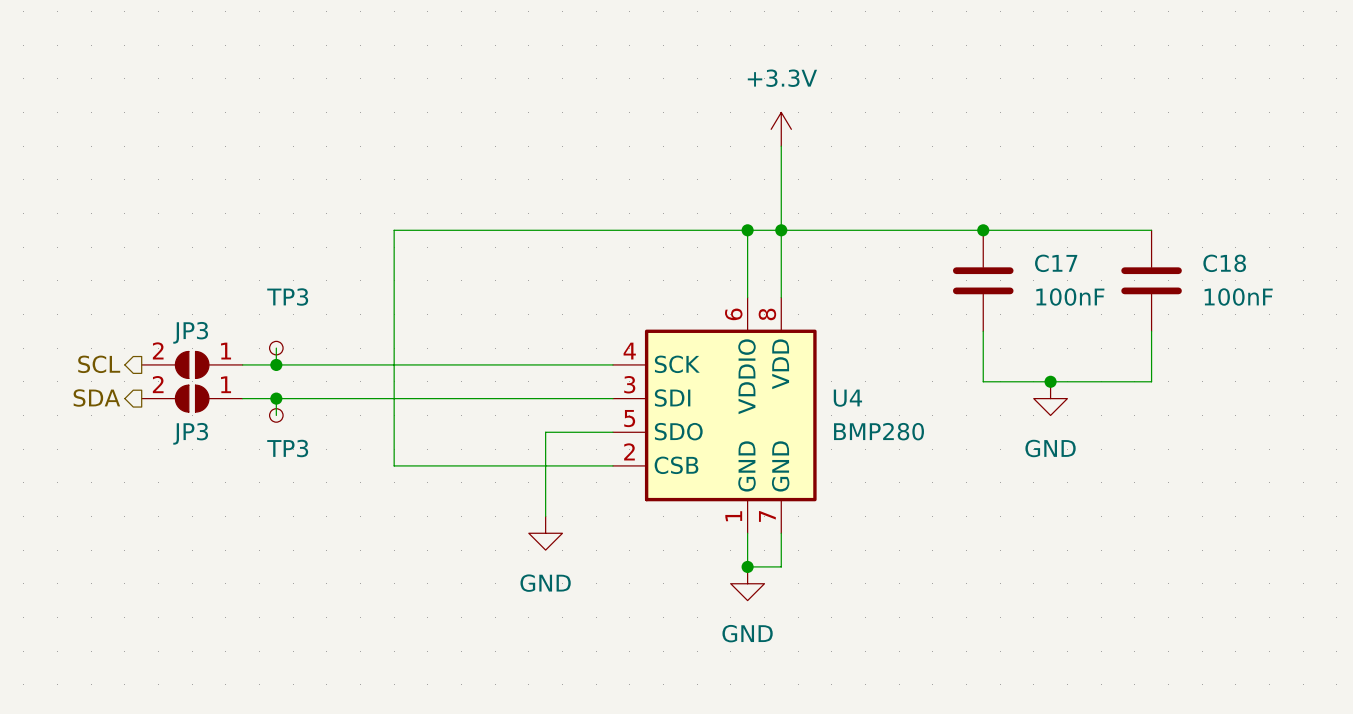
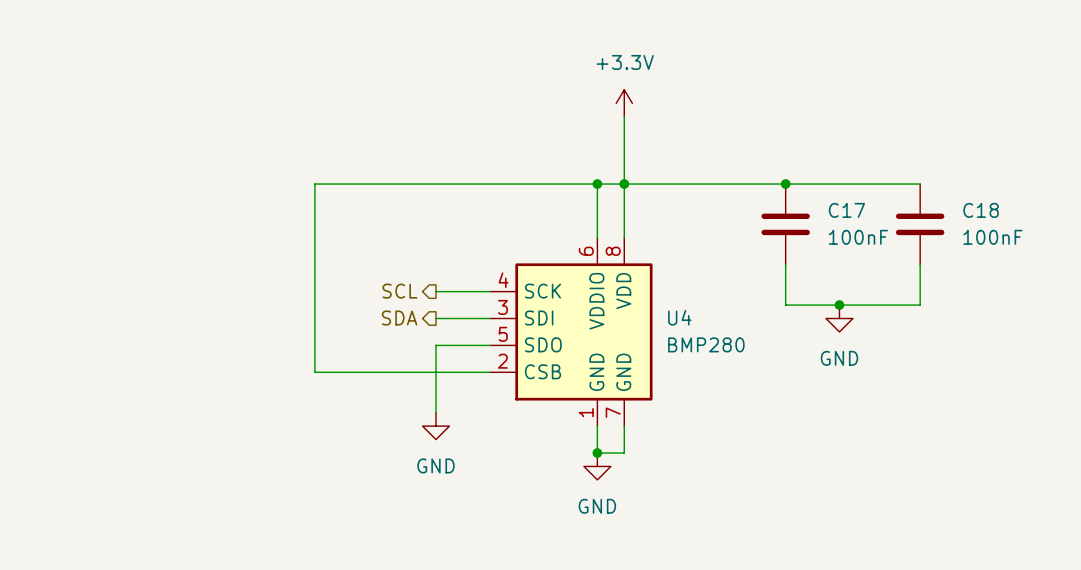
wire: (276, 348) (276, 364) -> none
TP3: (276, 348) -> none
hierarchical label: SCL (99, 364) -> none
JP3: (192, 364) -> none
wire: (242, 364) (545, 364) -> none
junction: (276, 364) -> none
hierarchical label: none -> SCL (399, 291)
hierarchical label: SDA (96, 398) -> none
JP3: (192, 398) -> none
wire: (242, 398) (545, 398) -> none
wire: (276, 398) (276, 415) -> none
junction: (276, 398) -> none
hierarchical label: none -> SDA (399, 318)
TP3: (276, 415) -> none

